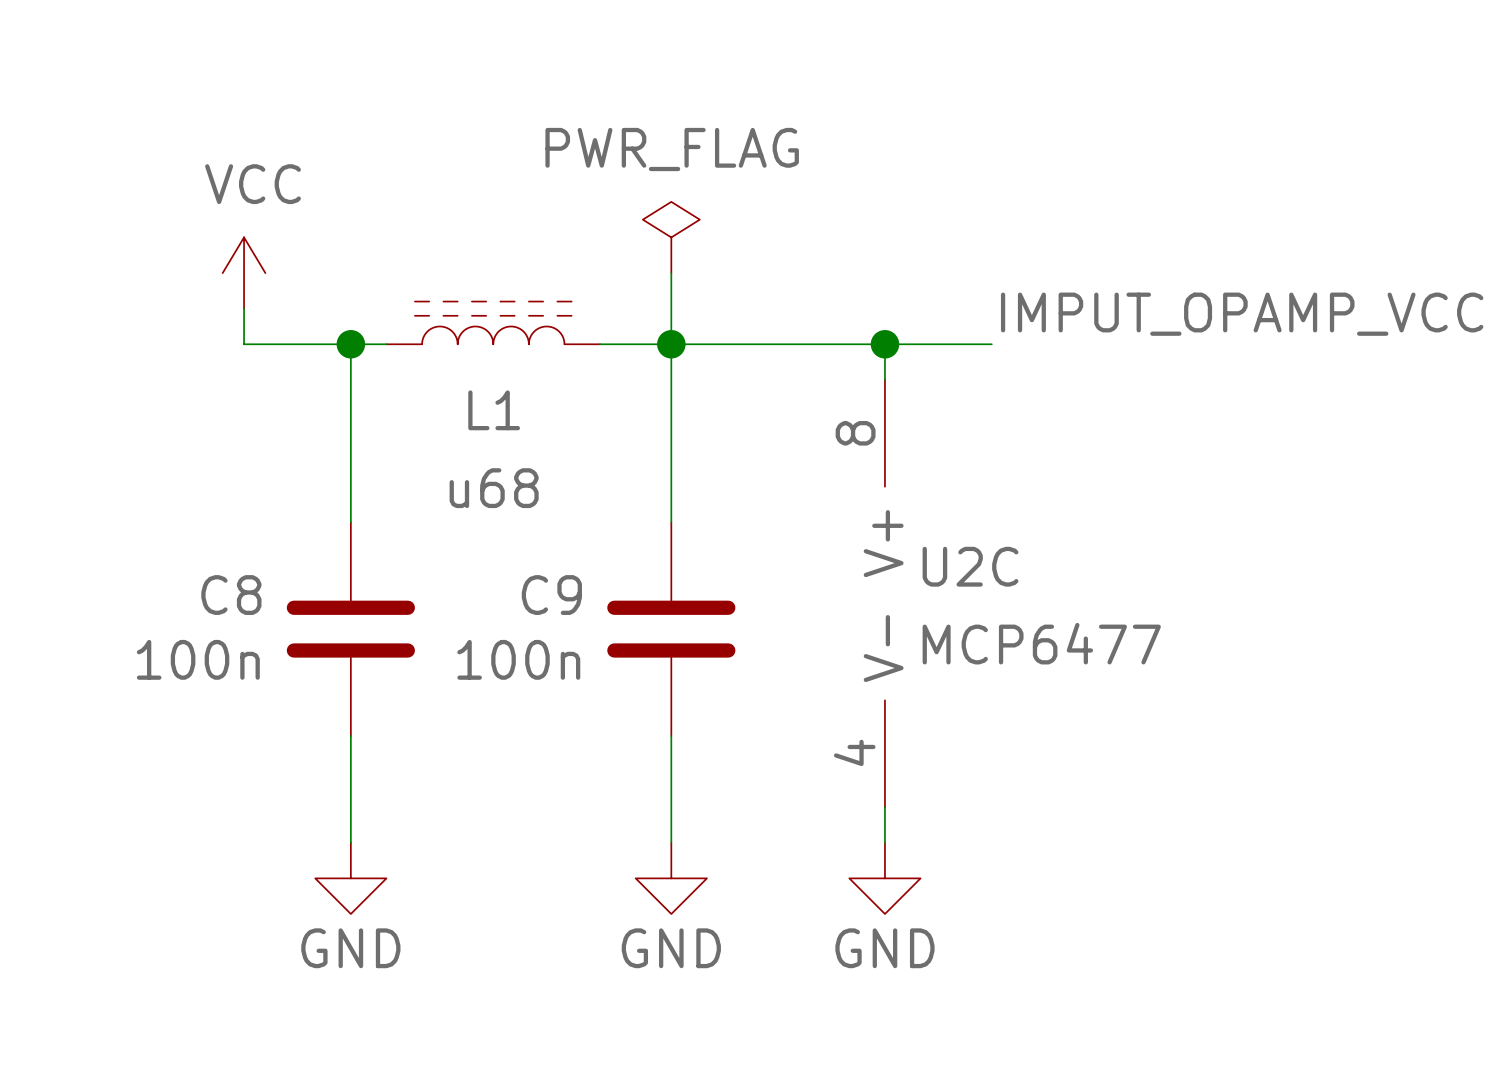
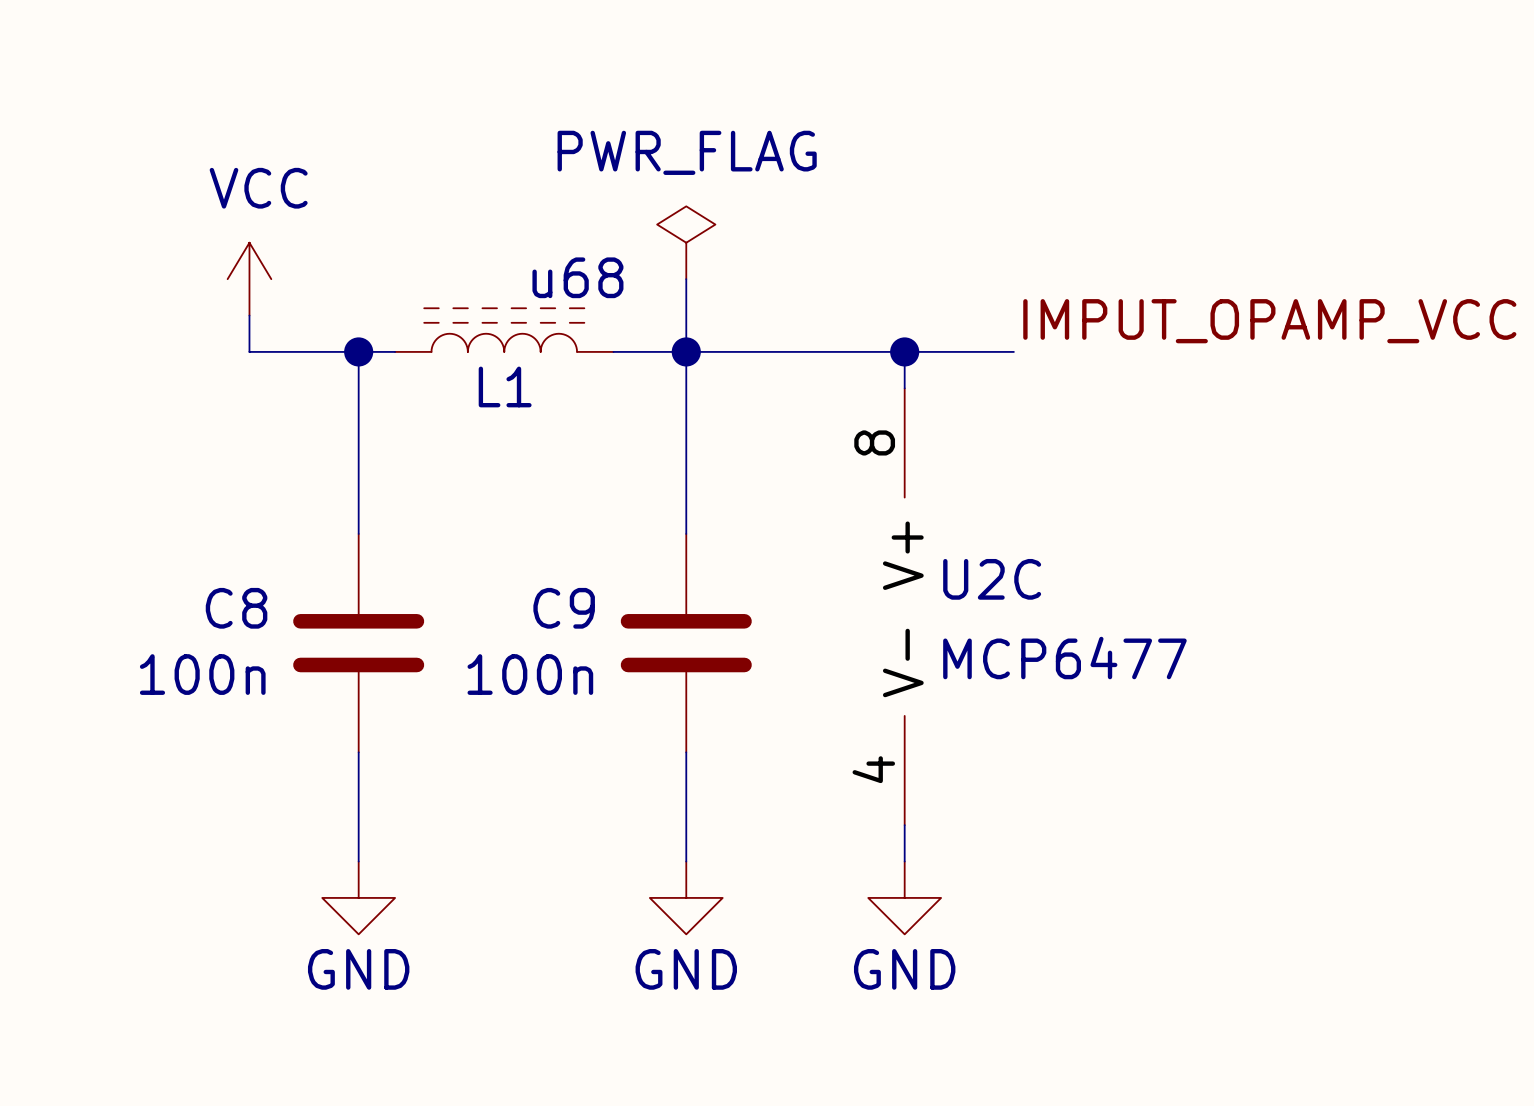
L1 name position: L1 (494, 410) -> L1 (505, 386)
L1 value position: u68 (494, 488) -> u68 (577, 277)

